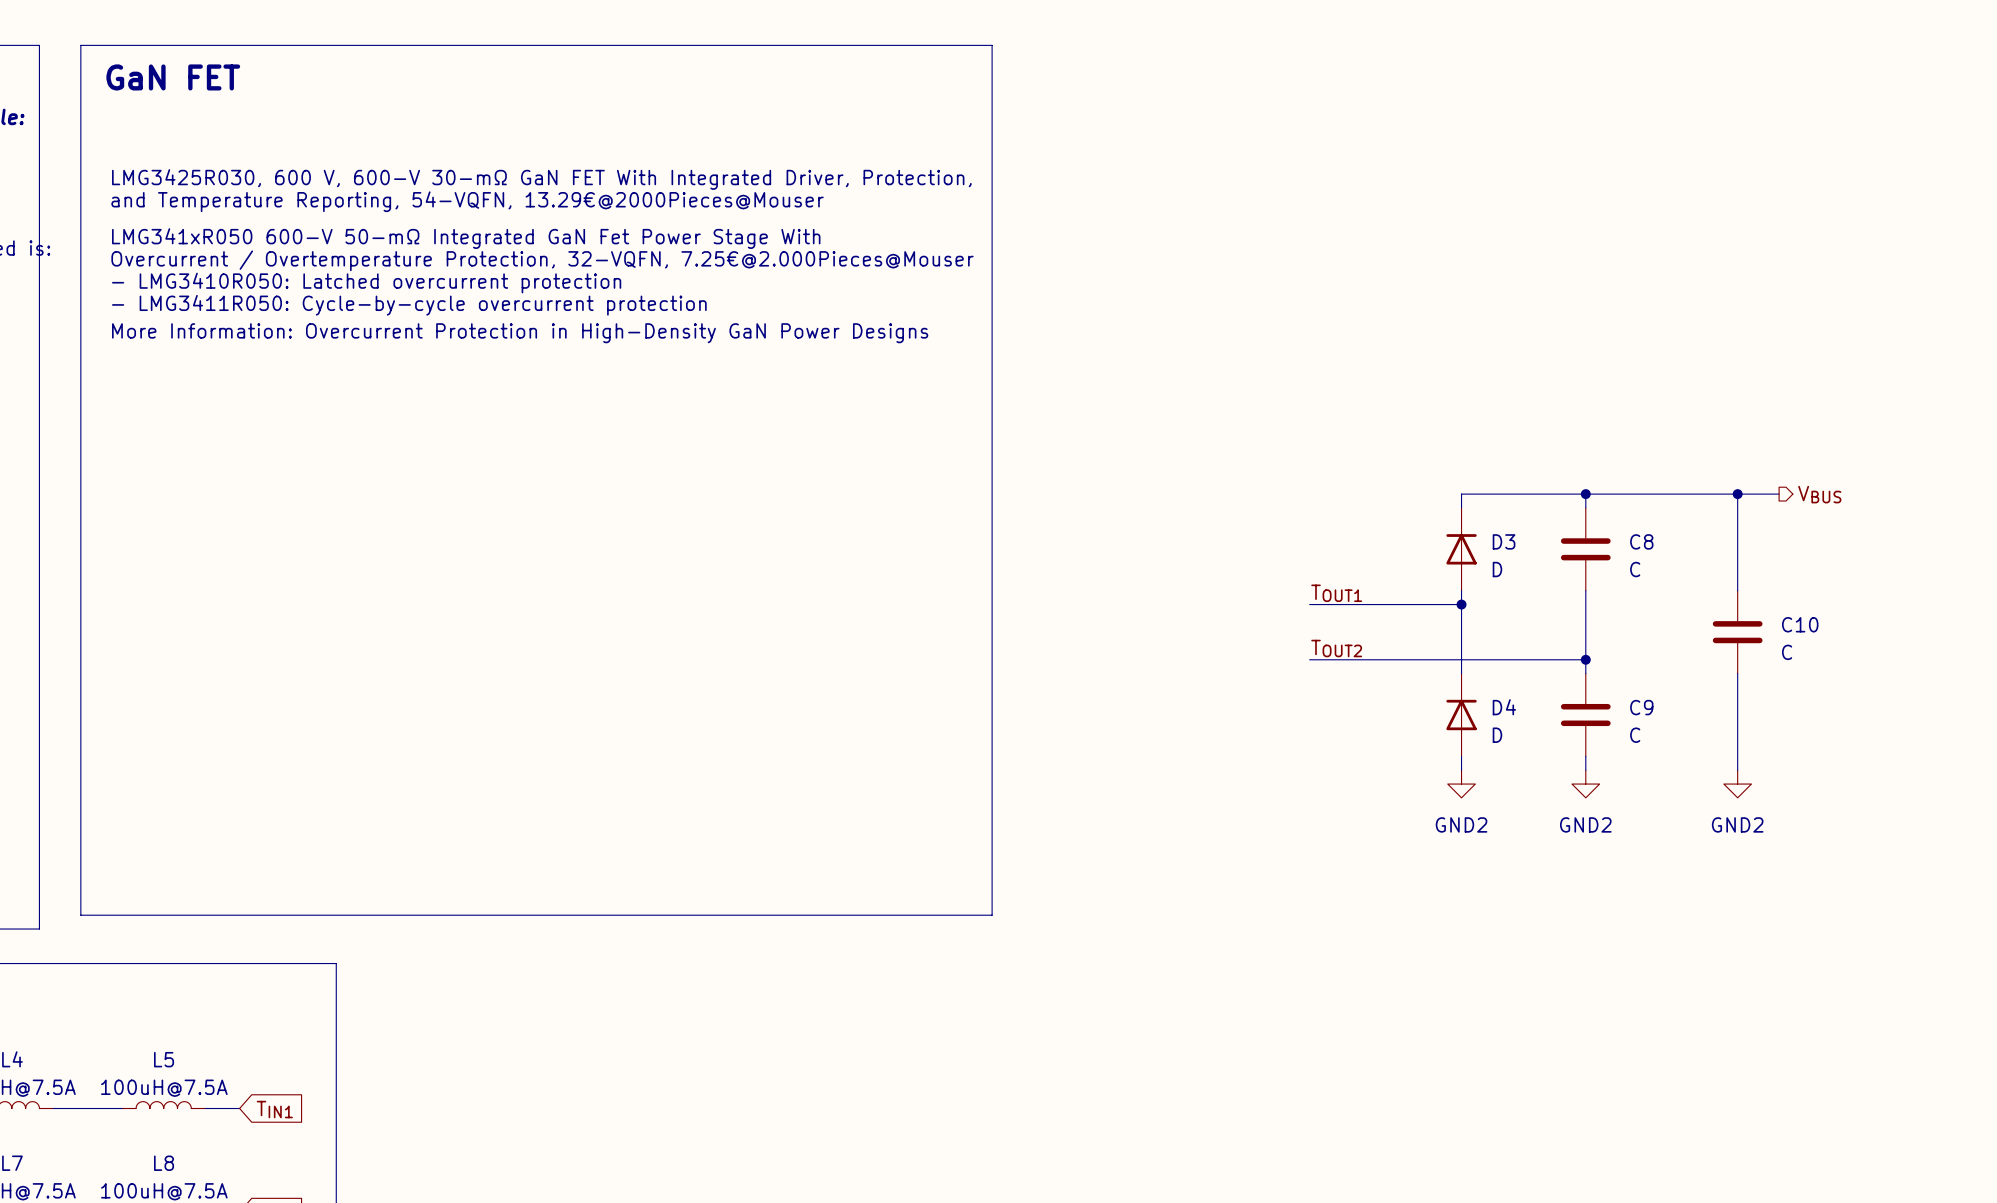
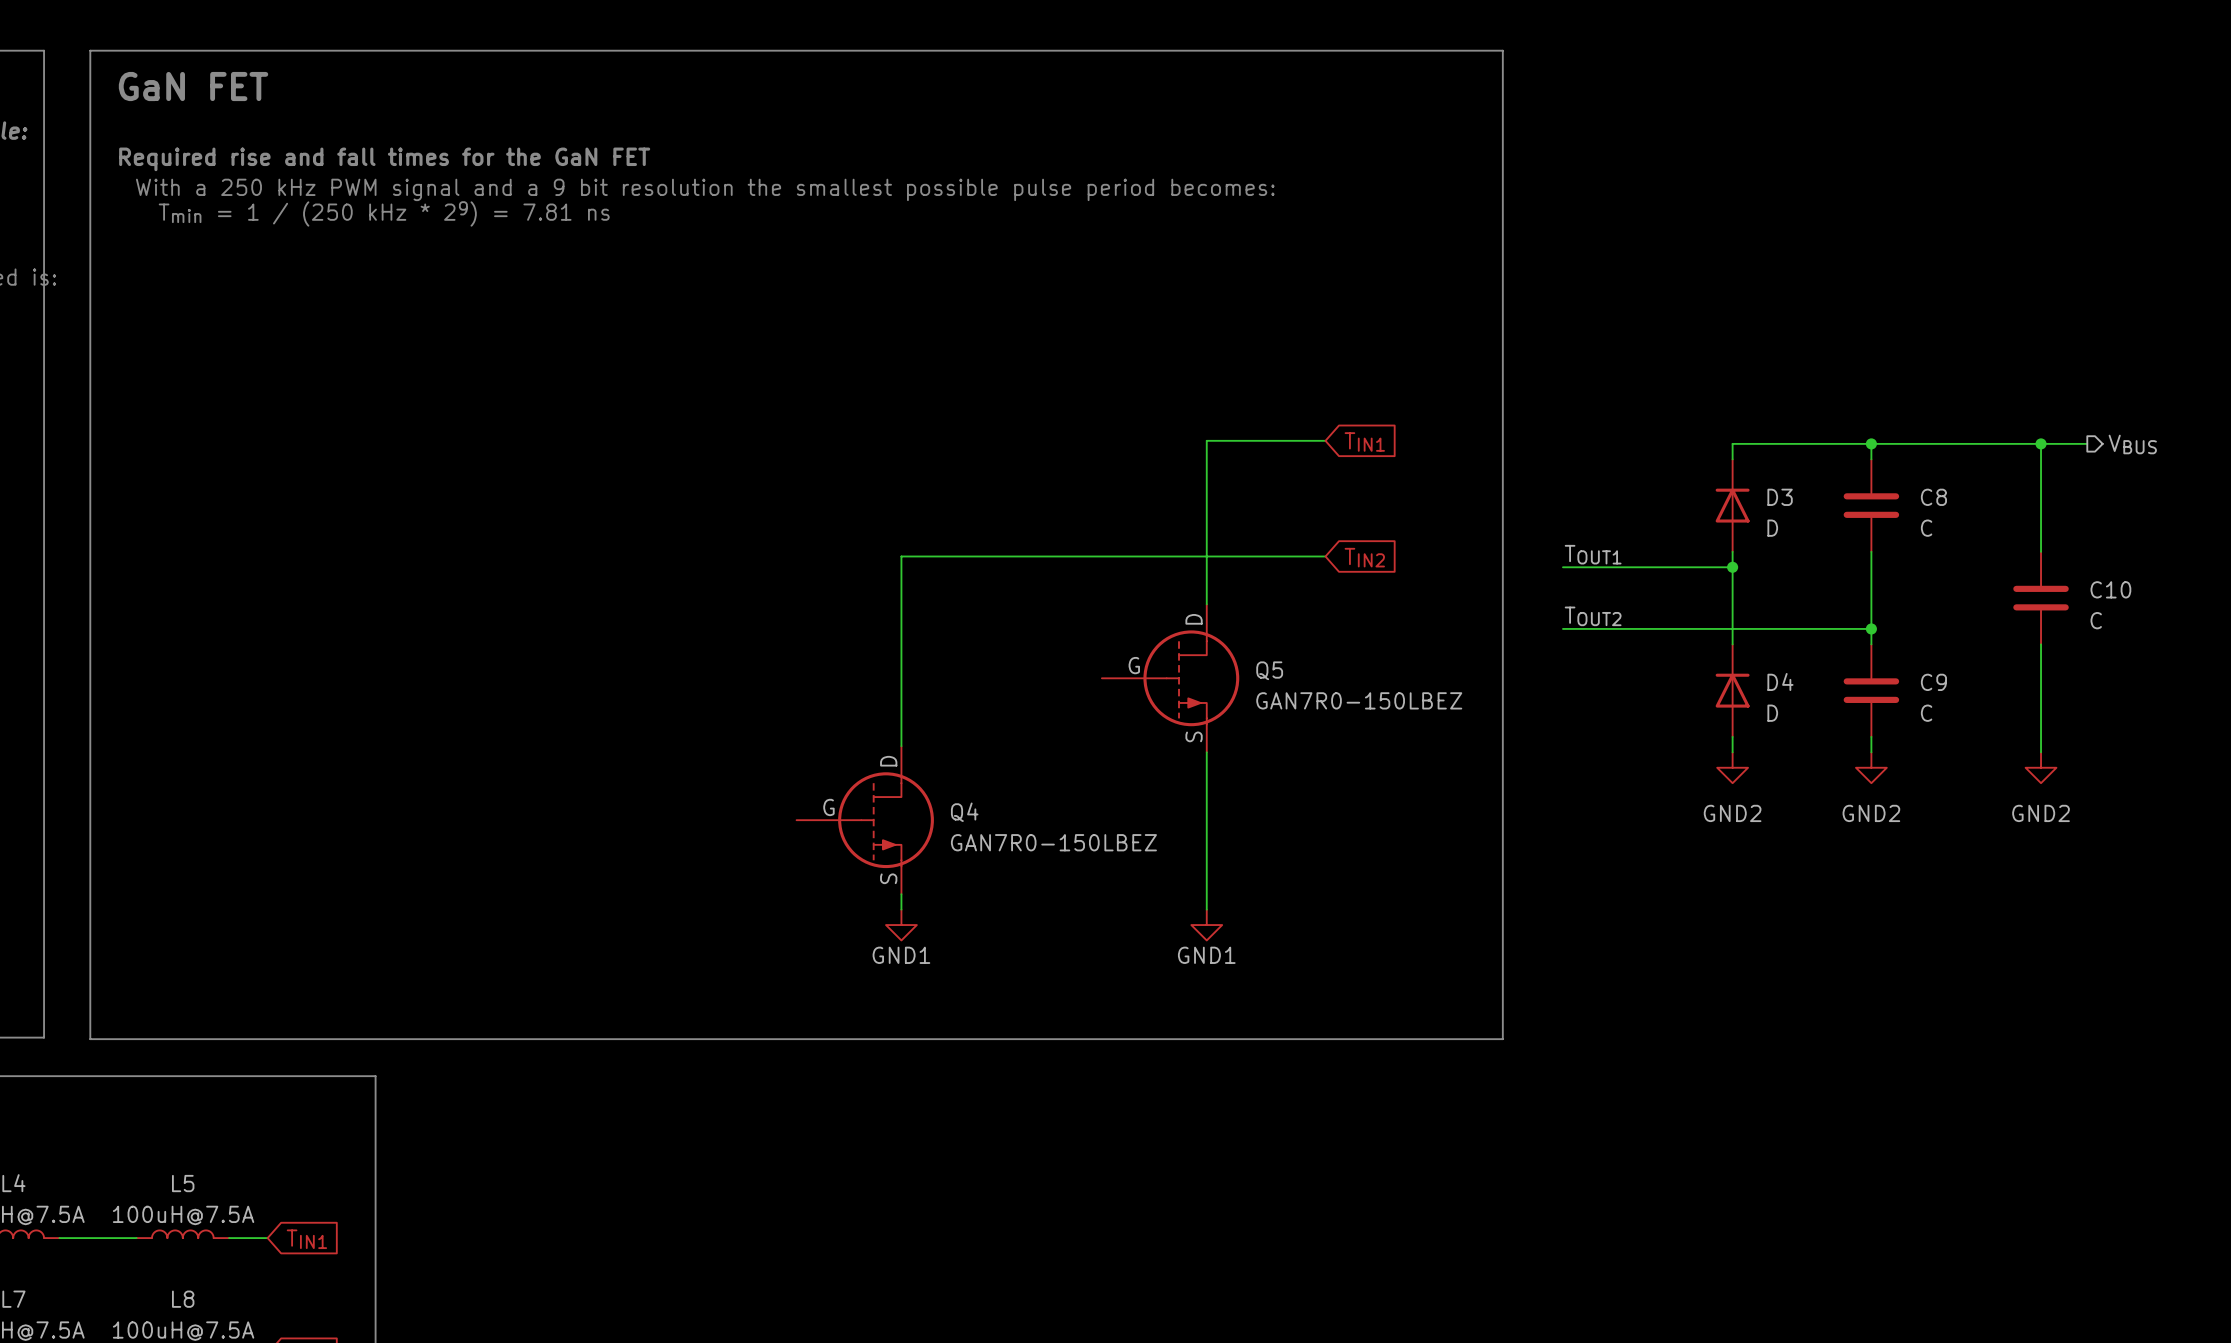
line: (992, 45) (992, 915) (80, 915) -> (1108, 50) (1502, 50) (1502, 1039) (90, 1039) (90, 1022)
text: none -> Required rise and fall times for the GaN FET (384, 159)
text: none -> With a 250 kHz PWM signal and a 9 bit resolution the smallest possible pulse period becomes: (705, 189)
text: LMG3425R030, 600 V, 600-V 30-mΩ GaN FET With Integrated Driver, Protection, (541, 179) -> none
text: none -> Tmin = 1 / (250 kHz * 29) = 7.81 ns (384, 213)
text: and Temperature Reporting, 54-VQFN, 13.29€@2000Pieces@Mouser (467, 201) -> none
text: LMG341xR050 600-V 50-mΩ Integrated GaN Fet Power Stage With (466, 238) -> none
text: Overcurrent / Overtemperature Protection, 32-VQFN, 7.25€@2.000Pieces@Mouser (542, 260) -> none
text: - LMG3410R050: Latched overcurrent protection (366, 283) -> none
text: - LMG3411R050: Cycle-by-cycle overcurrent protection (409, 305) -> none
text: More Information: Overcurrent Protection in High-Density GaN Power Designs (520, 333) -> none
wire: none -> (1325, 440) (1206, 440) (1206, 604)
global label: none -> TIN1 (1364, 441)
junction: none -> (1871, 443)
junction: none -> (2041, 443)
wire: (1585, 494) (1585, 507) -> (1871, 443) (1871, 459)
junction position: (1585, 494) -> (1732, 567)
wire: (1737, 494) (1737, 590) -> (2041, 443) (2041, 551)
junction: (1737, 494) -> none
wire: (1779, 494) (1461, 494) (1461, 507) -> (2087, 443) (1732, 443) (1732, 459)
hierarchical label position: VBUS (1819, 494) -> VBUS (2132, 444)
wire: none -> (1325, 556) (901, 556) (901, 746)
global label: none -> TIN2 (1364, 557)
D3 position: (1461, 549) -> (1732, 505)
C8 position: (1585, 549) -> (1871, 505)
junction: none -> (1871, 628)
wire: (1461, 590) (1461, 673) -> (1732, 551) (1732, 644)
wire: (1585, 590) (1585, 673) -> (1871, 551) (1871, 644)
label position: TOUT1 (1336, 593) -> TOUT1 (1593, 554)
wire: (1309, 604) (1461, 604) -> (1562, 567) (1732, 567)
junction: (1461, 604) -> none
Q5: none -> GAN7R0-150LBEZ (1170, 678)
C10 position: (1737, 632) -> (2041, 598)
label position: TOUT2 (1336, 648) -> TOUT2 (1593, 616)
wire: (1309, 659) (1585, 659) -> (1562, 628) (1871, 628)
junction: (1585, 659) -> none
wire: none -> (1206, 752) (1206, 909)
wire: (1737, 673) (1737, 770) -> (2041, 644) (2041, 752)
power symbol: none -> GND2 (1732, 767)
power symbol: none -> GND2 (1871, 767)
power symbol: none -> GND2 (2041, 767)
D4 position: (1461, 715) -> (1732, 690)
C9 position: (1585, 715) -> (1871, 690)
Q4: none -> GAN7R0-150LBEZ (865, 820)
wire: (1461, 756) (1461, 770) -> (1732, 736) (1732, 752)
wire: (1585, 756) (1585, 770) -> (1871, 736) (1871, 752)
power symbol: GND2 (1461, 784) -> none
power symbol: GND2 (1585, 784) -> none
power symbol: GND2 (1737, 784) -> none
wire: none -> (901, 894) (901, 909)
power symbol: none -> GND1 (901, 925)
power symbol: none -> GND1 (1206, 925)

